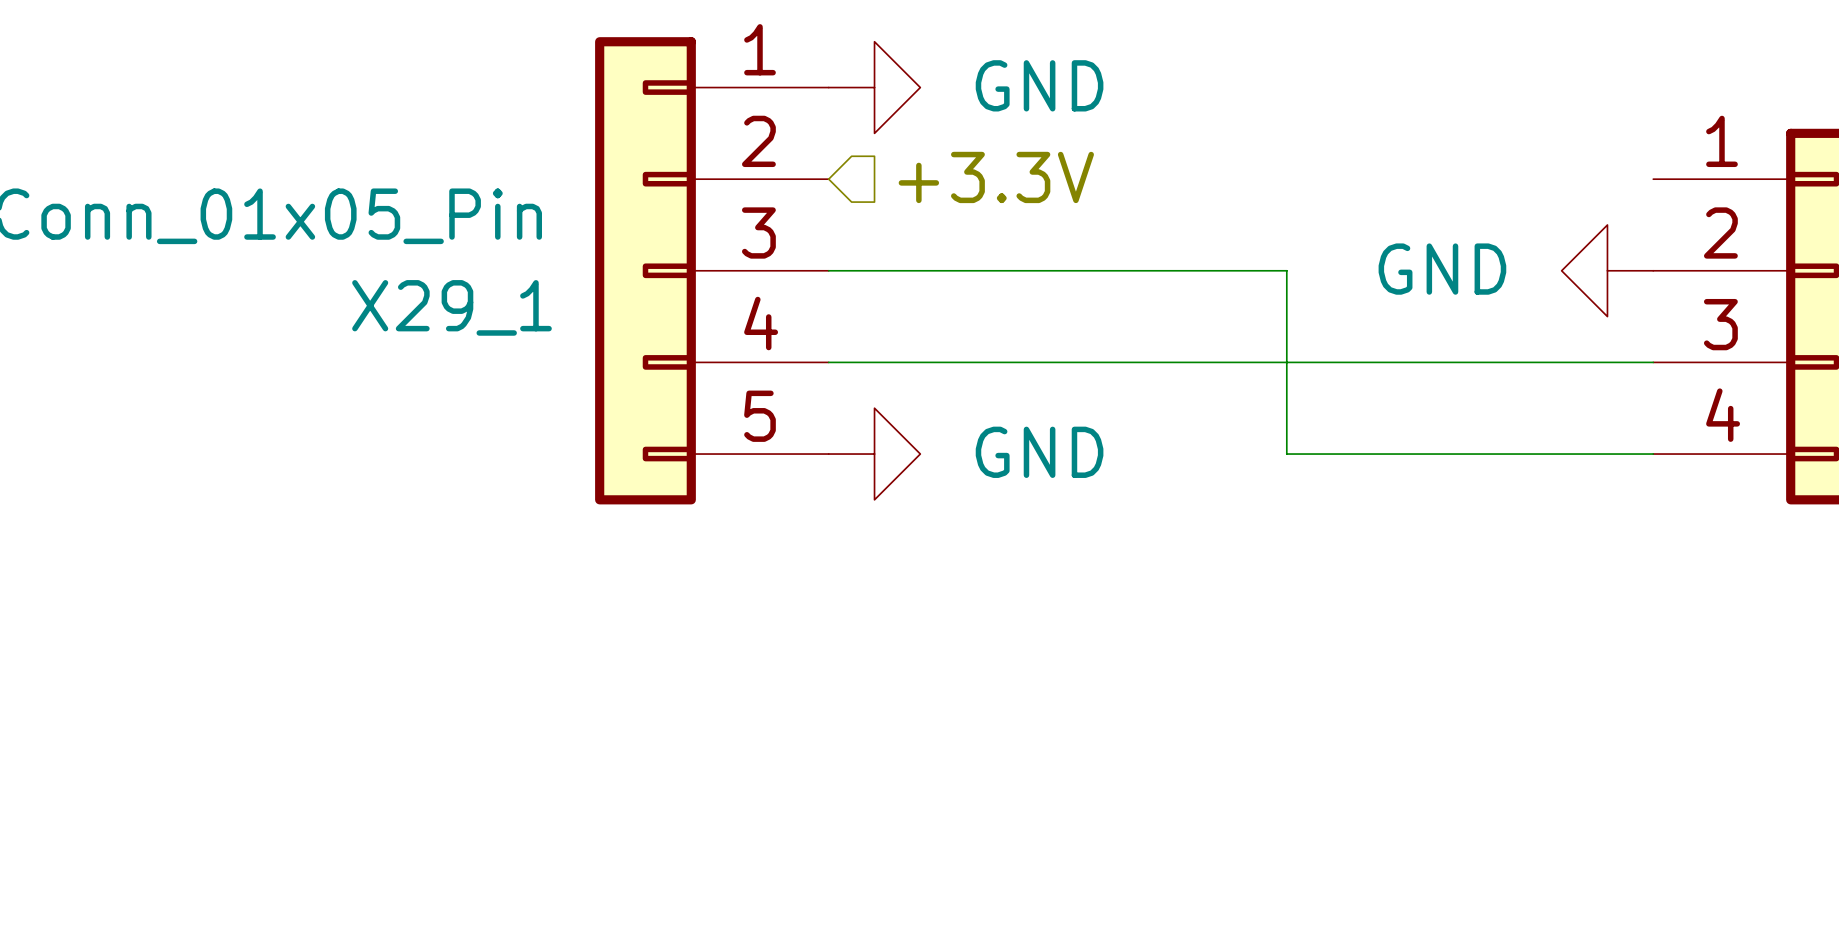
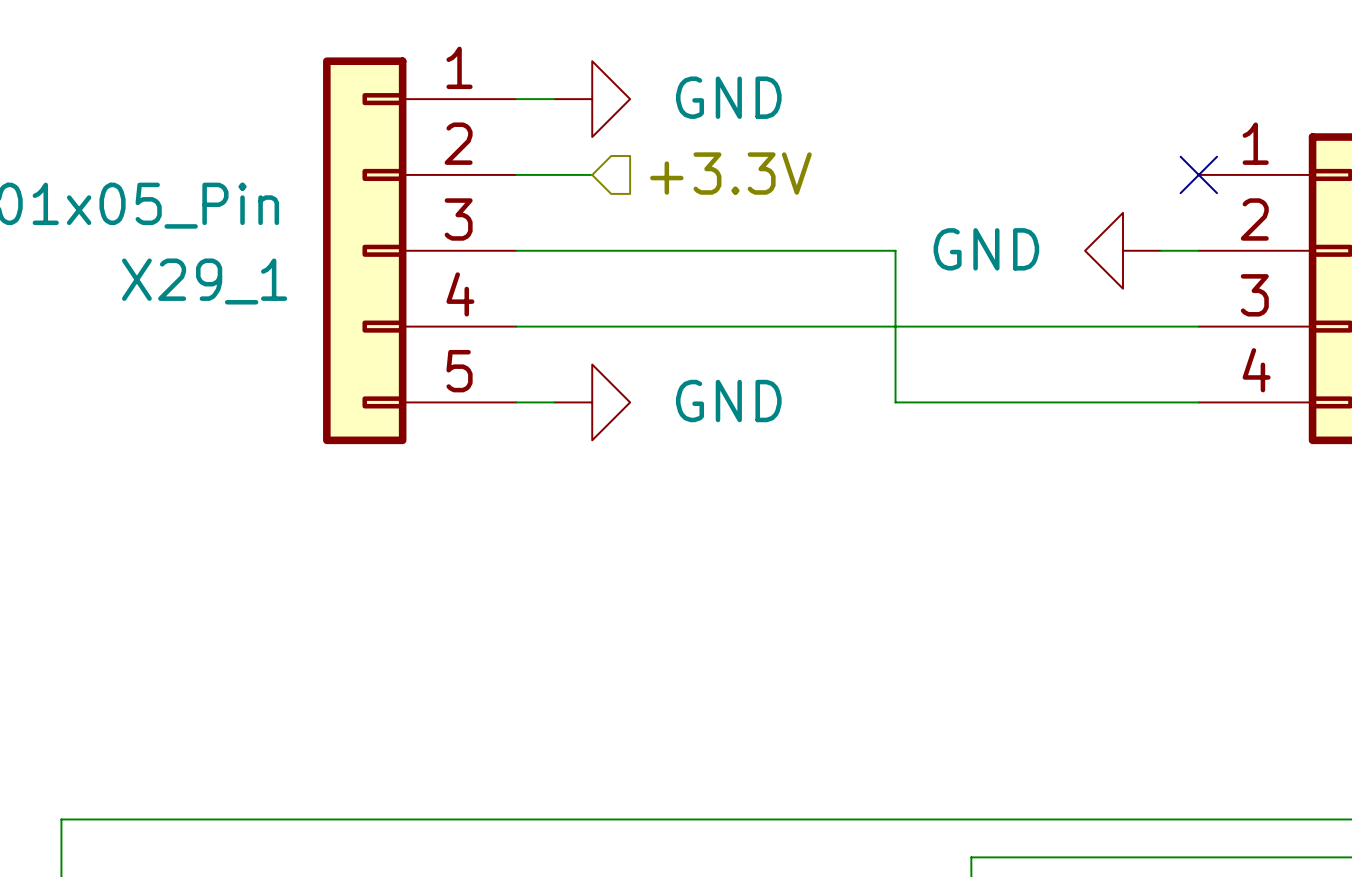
power symbol position: GND (874, 87) -> GND (592, 99)
hierarchical label position: +3.3V (996, 177) -> +3.3V (730, 173)
wire: none -> (516, 174) (592, 174)
no-connect mark: none -> (1198, 174)
power symbol position: GND (1607, 270) -> GND (1123, 250)
power symbol position: GND (874, 454) -> GND (592, 402)

